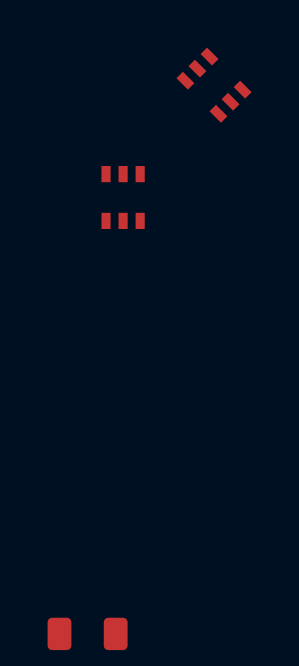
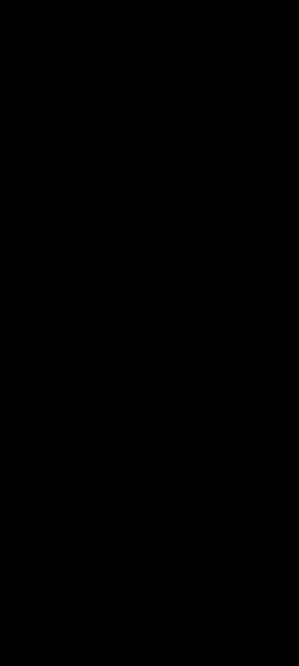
part: (214, 85) -> none
part: (123, 197) -> none
part: (87, 633) -> none

